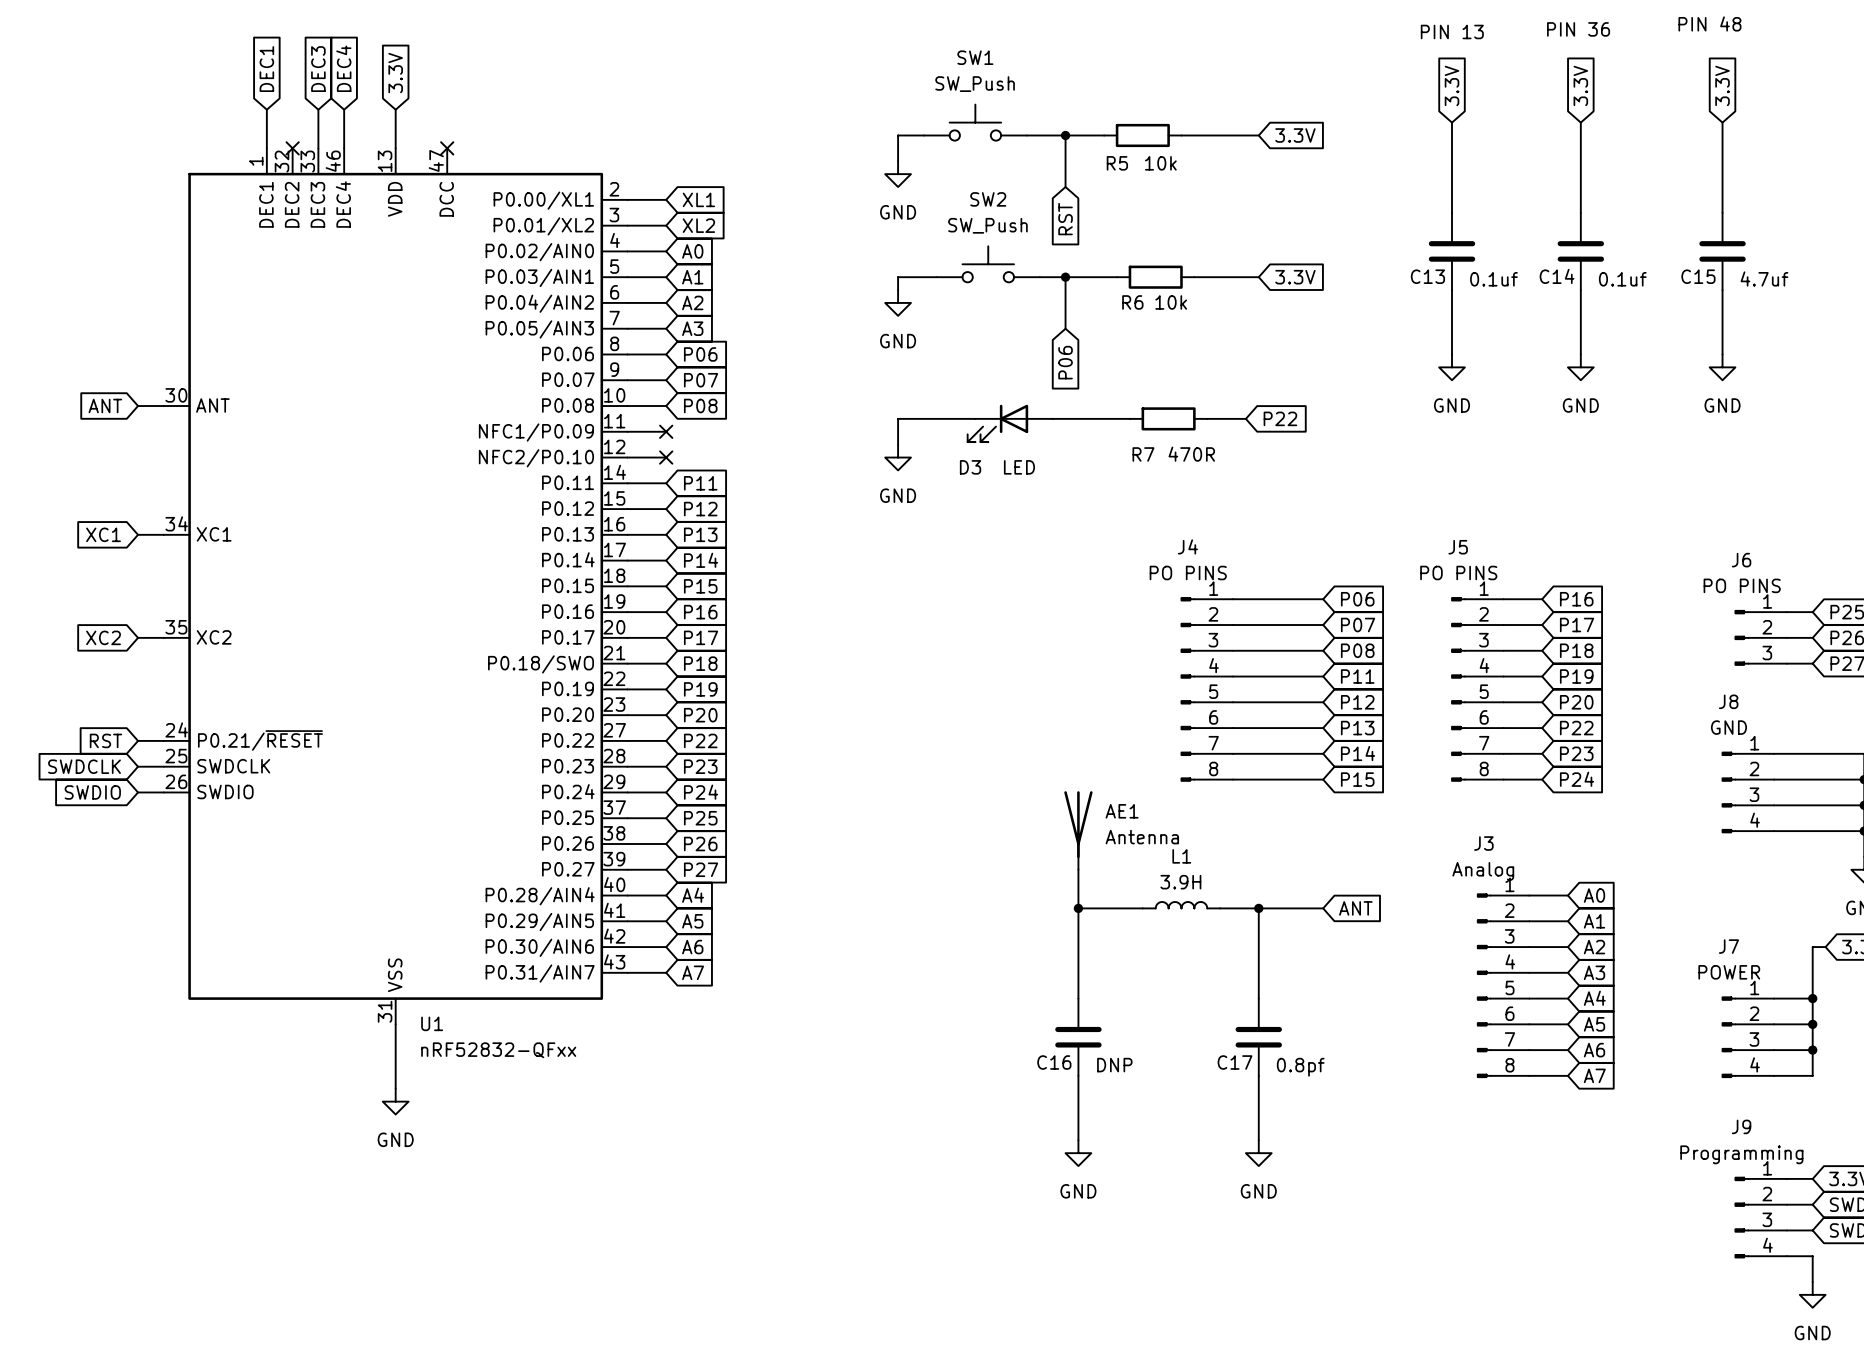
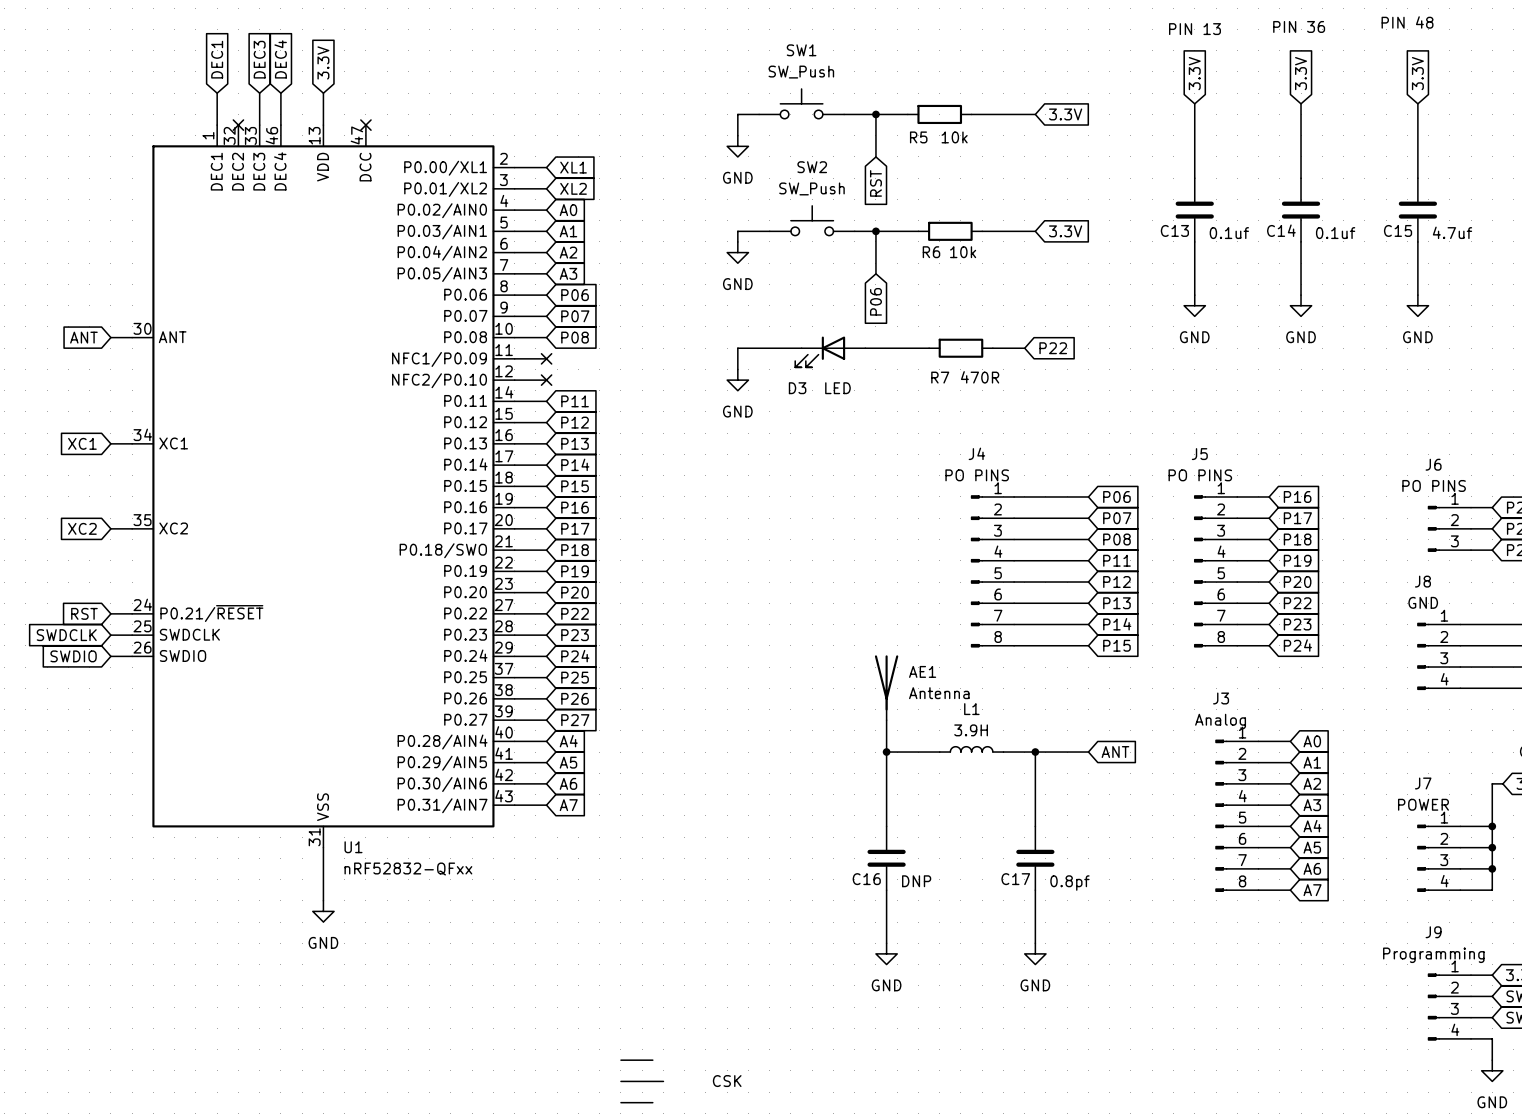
wire: none -> (620, 1060) (652, 1060)
wire: none -> (620, 1081) (663, 1081)
text: none -> CSK (727, 1081)
wire: none -> (620, 1102) (652, 1102)

